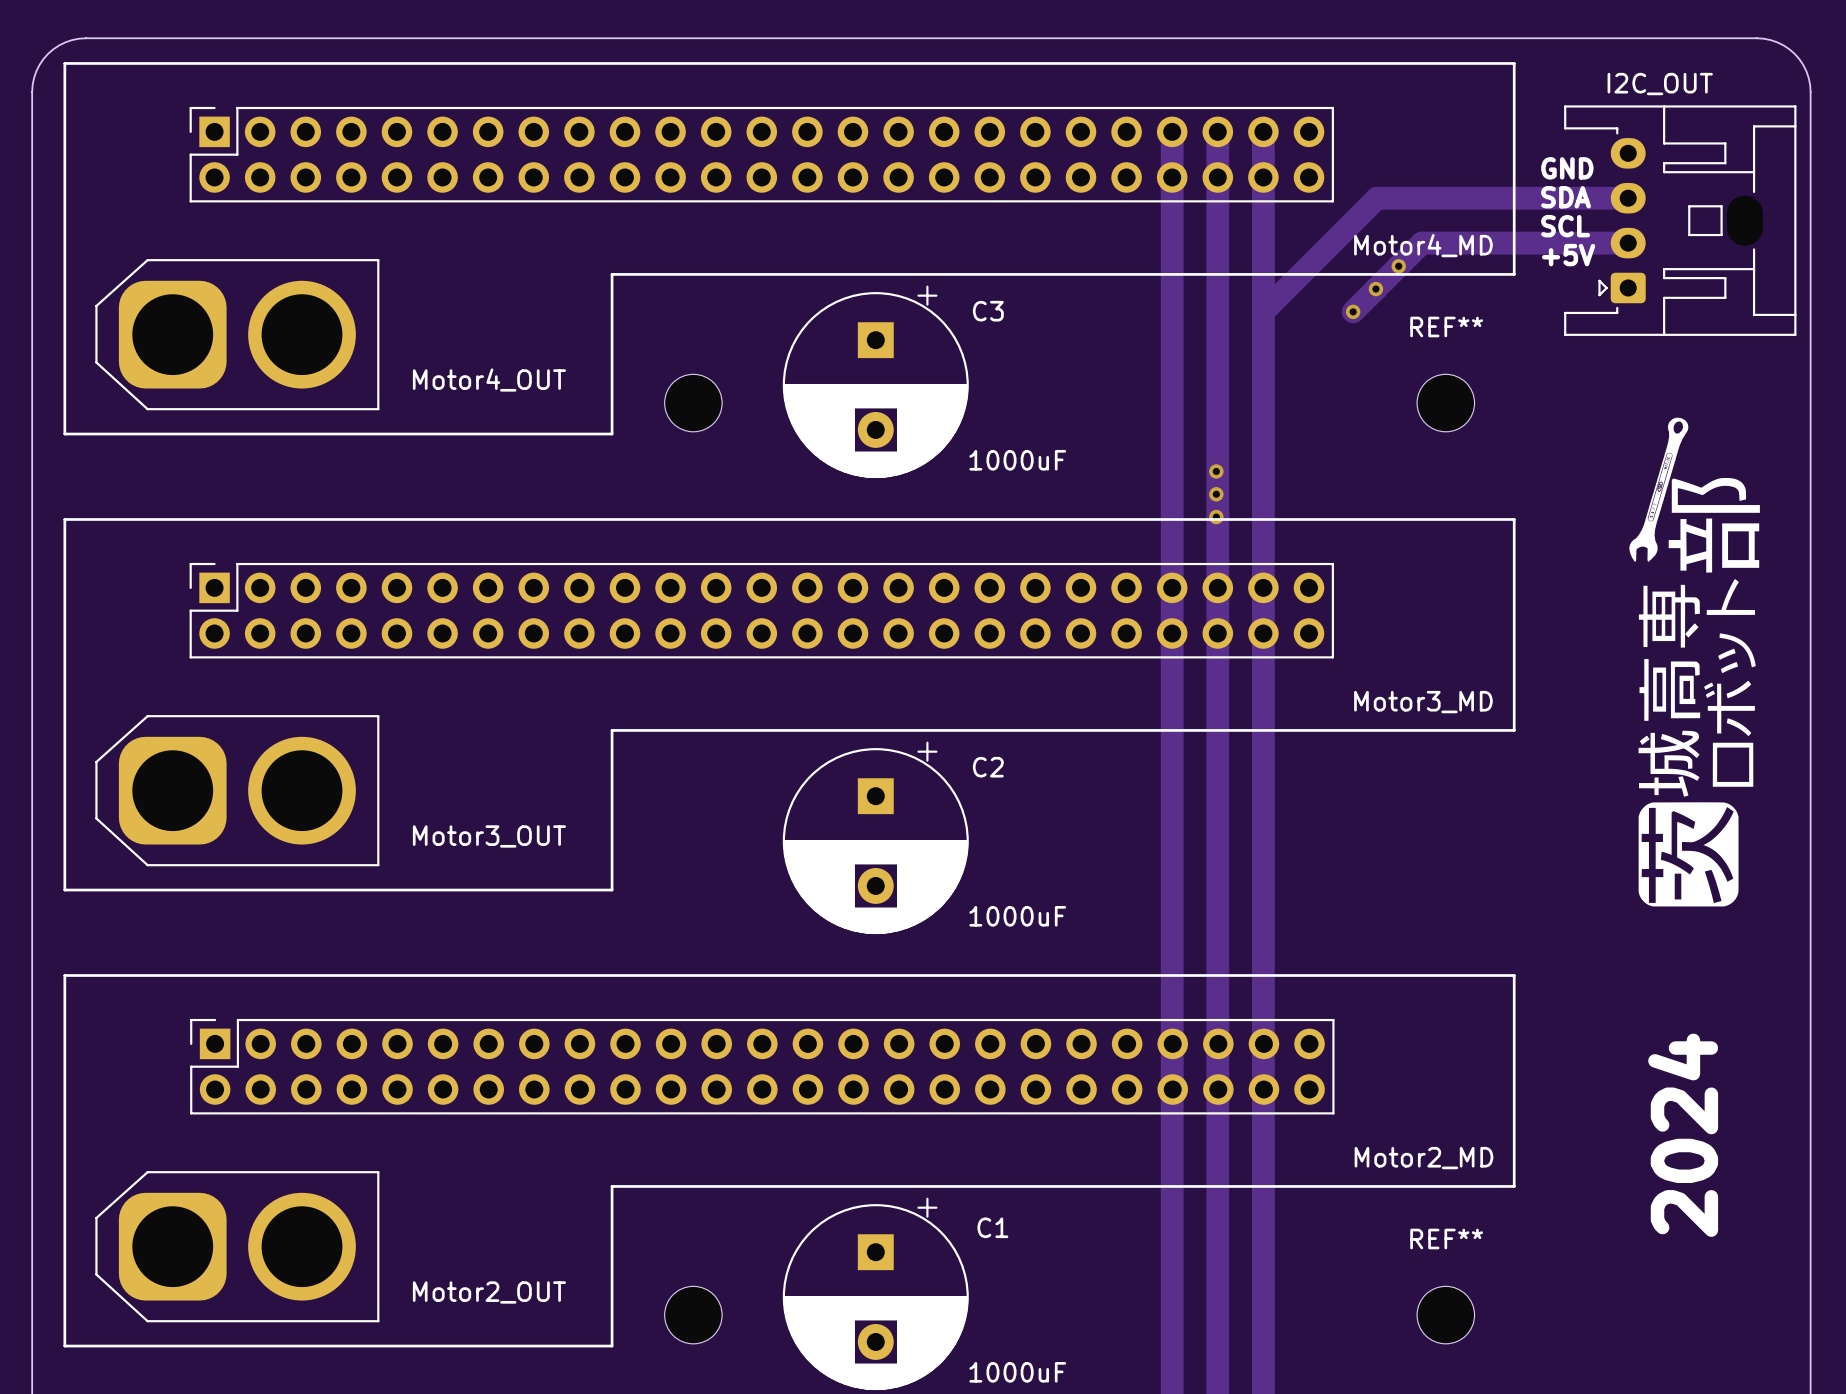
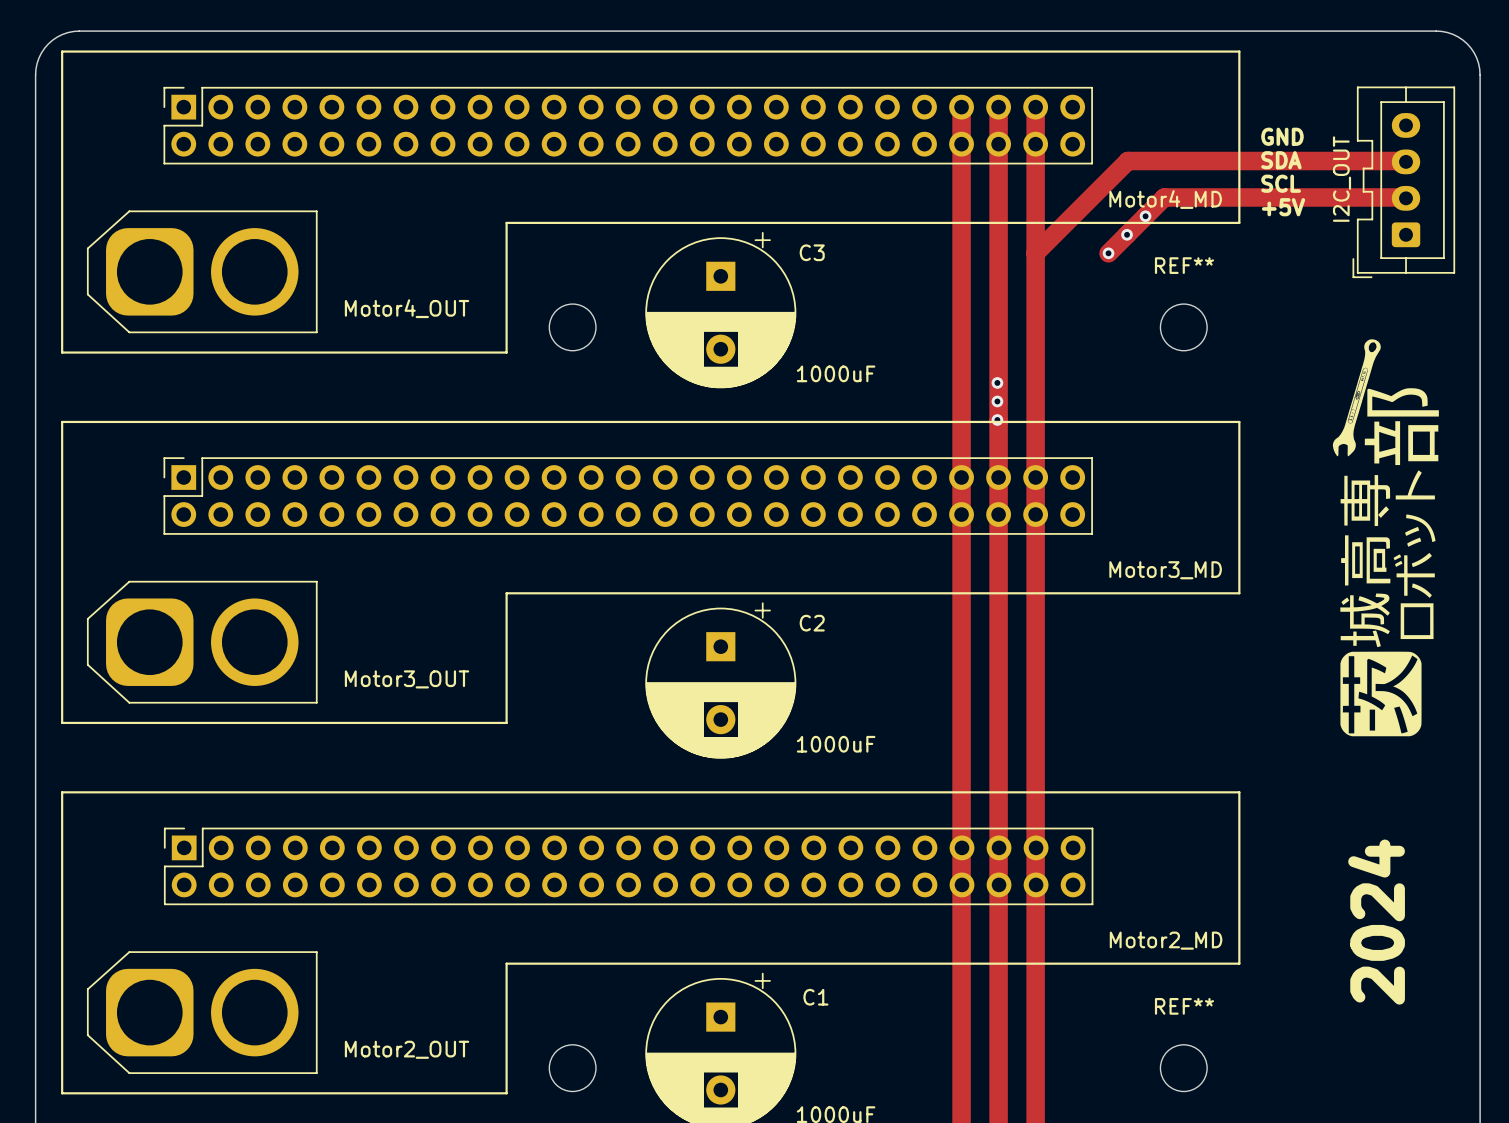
I2C_OUT name position: I2C_OUT (1660, 84) -> I2C_OUT (1342, 179)
I2C_OUT footprint: [1564, 105, 1797, 336] -> [1352, 86, 1456, 279]
track: none -> (1331, 161) (1406, 161)
track: none -> (1331, 197) (1406, 198)

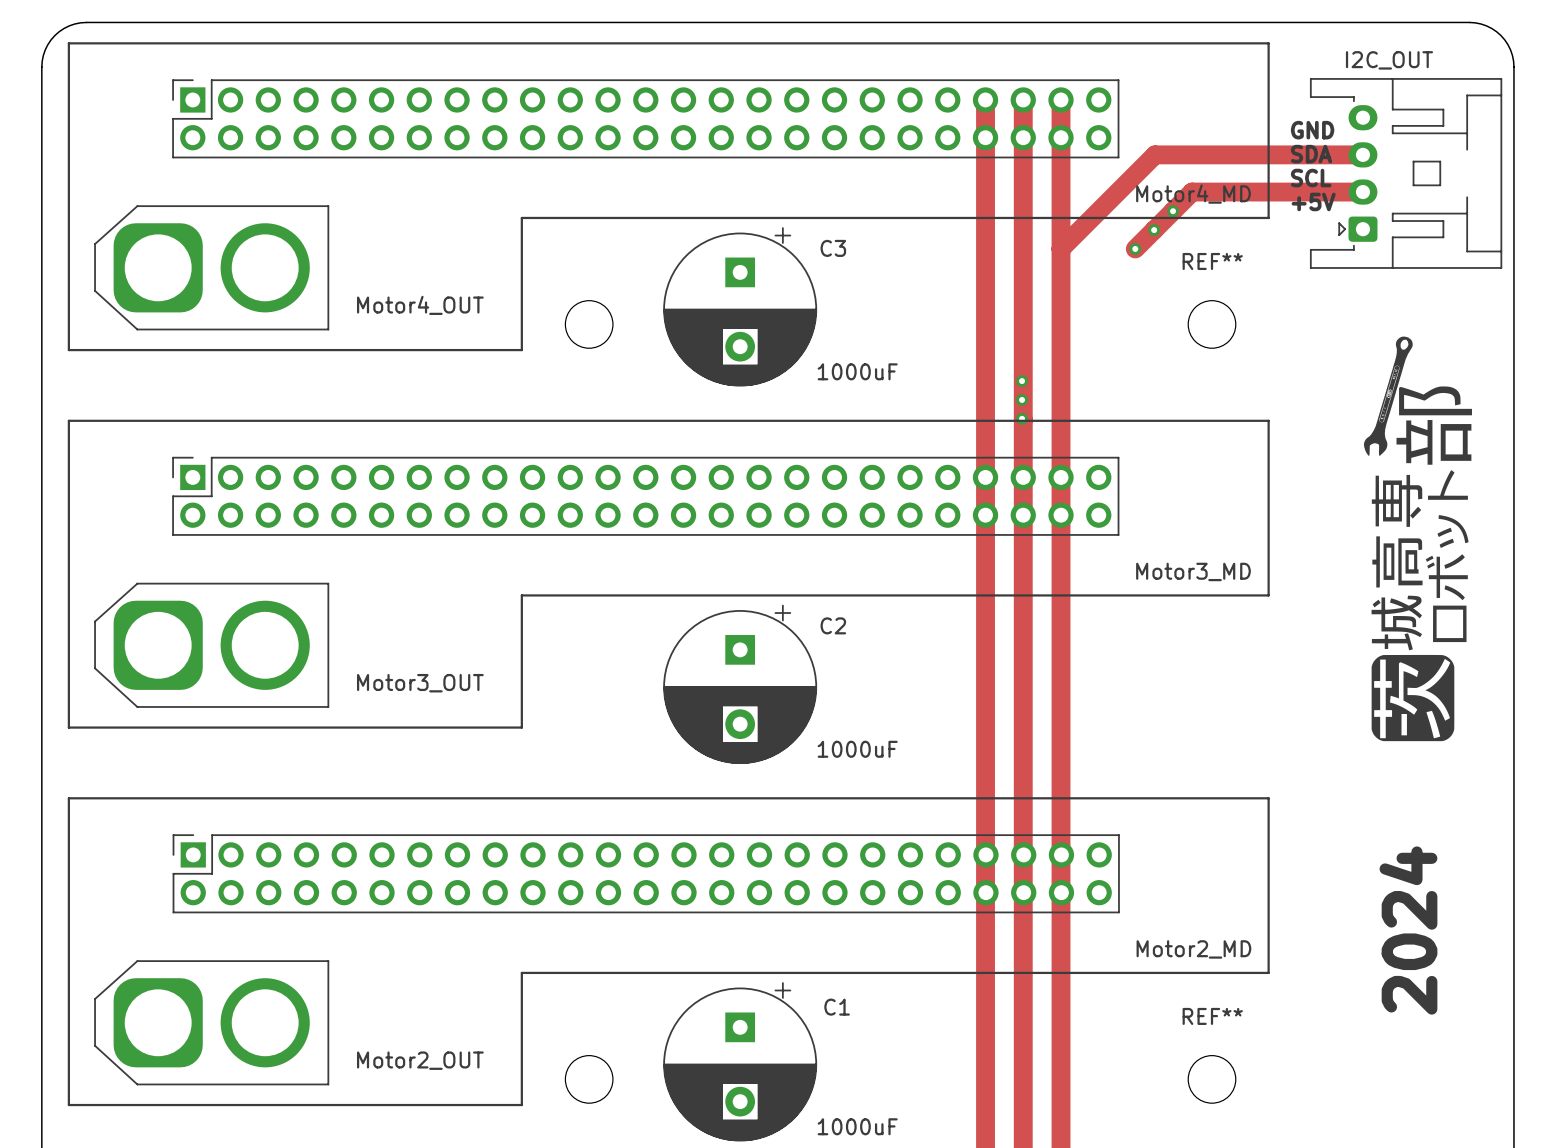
I2C_OUT footprint: [1352, 86, 1456, 279] -> [1309, 78, 1503, 269]
track: (1331, 161) (1406, 161) -> none
I2C_OUT name position: I2C_OUT (1342, 179) -> I2C_OUT (1389, 60)
track: (1331, 197) (1406, 198) -> none

